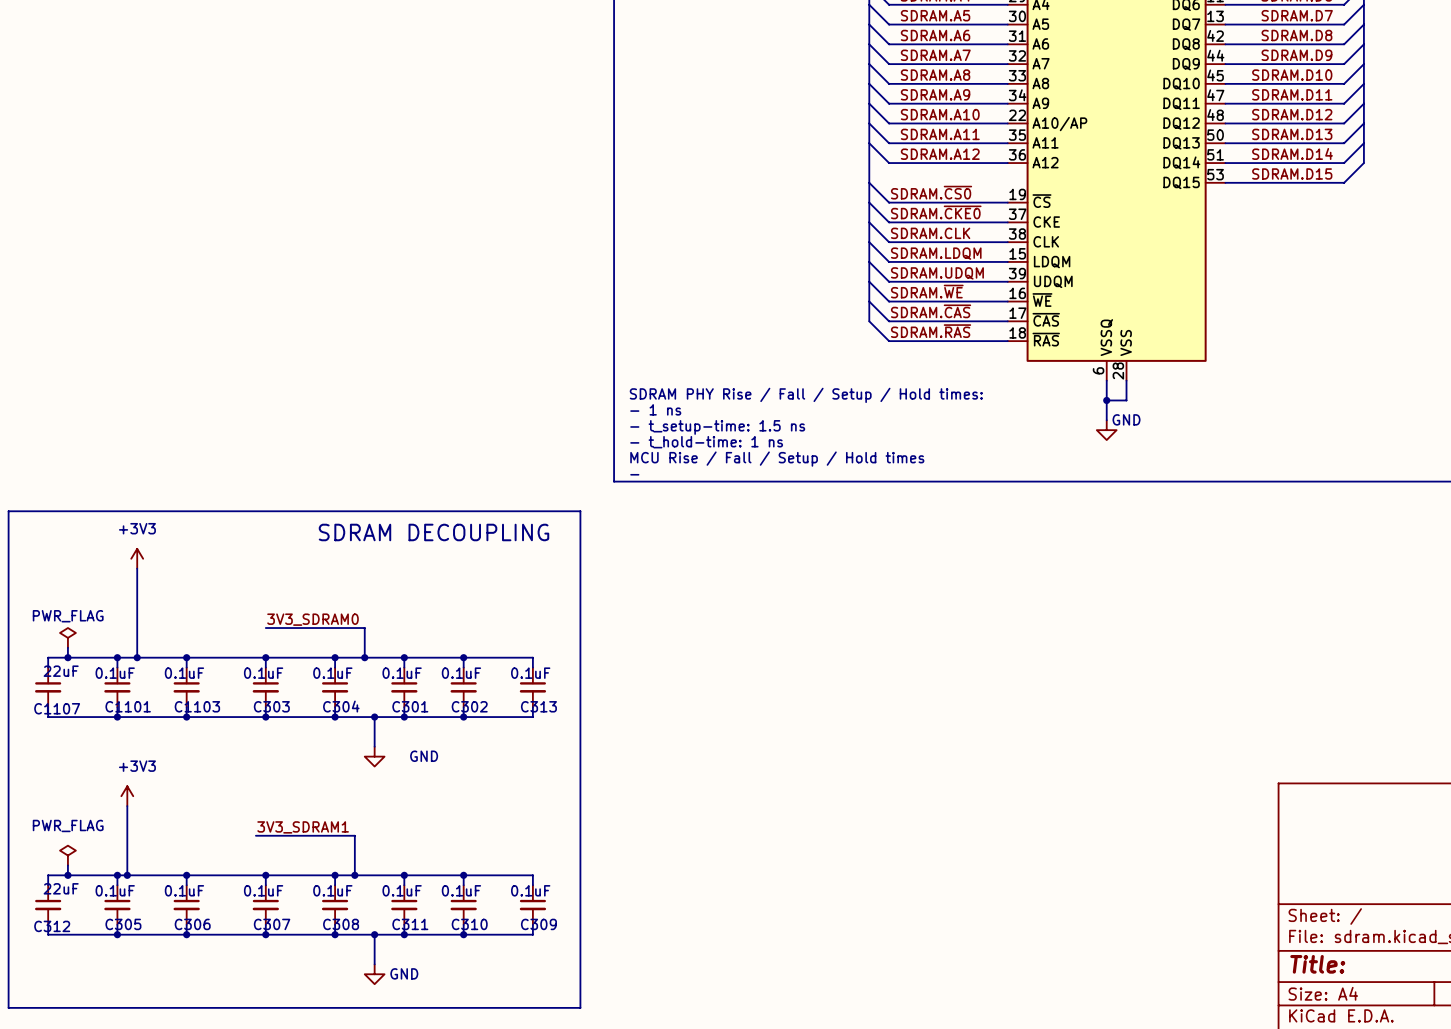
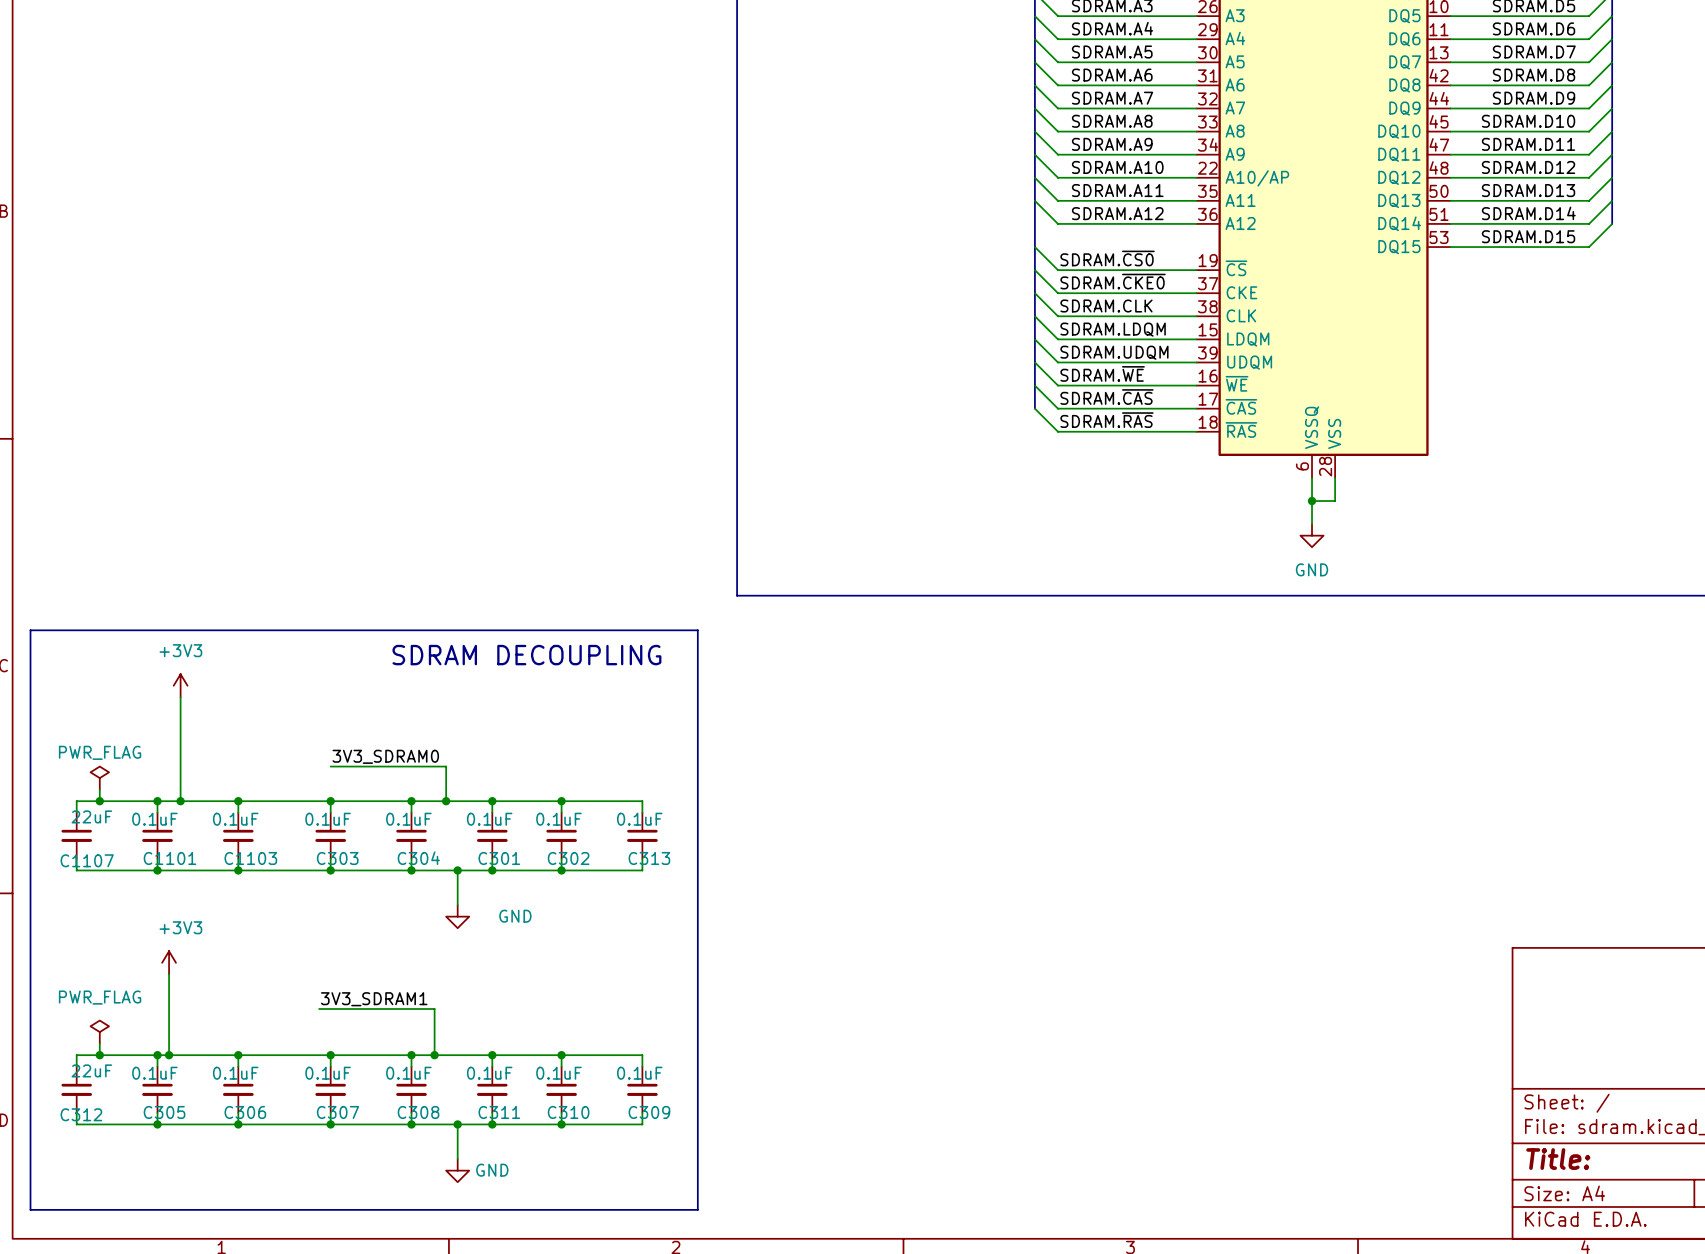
text: SDRAM PHY Rise / Fall / Setup / Hold times: (806, 395) -> none
text: - 1 ns (655, 409) -> none
power symbol text position: GND (1126, 419) -> GND (1312, 569)
text: - t_setup-time: 1.5 ns (717, 427) -> none
text: - t_hold-time: 1 ns (706, 442) -> none
text: MCU Rise / Fall / Setup / Hold times (777, 459) -> none
text: - (634, 474) -> none

